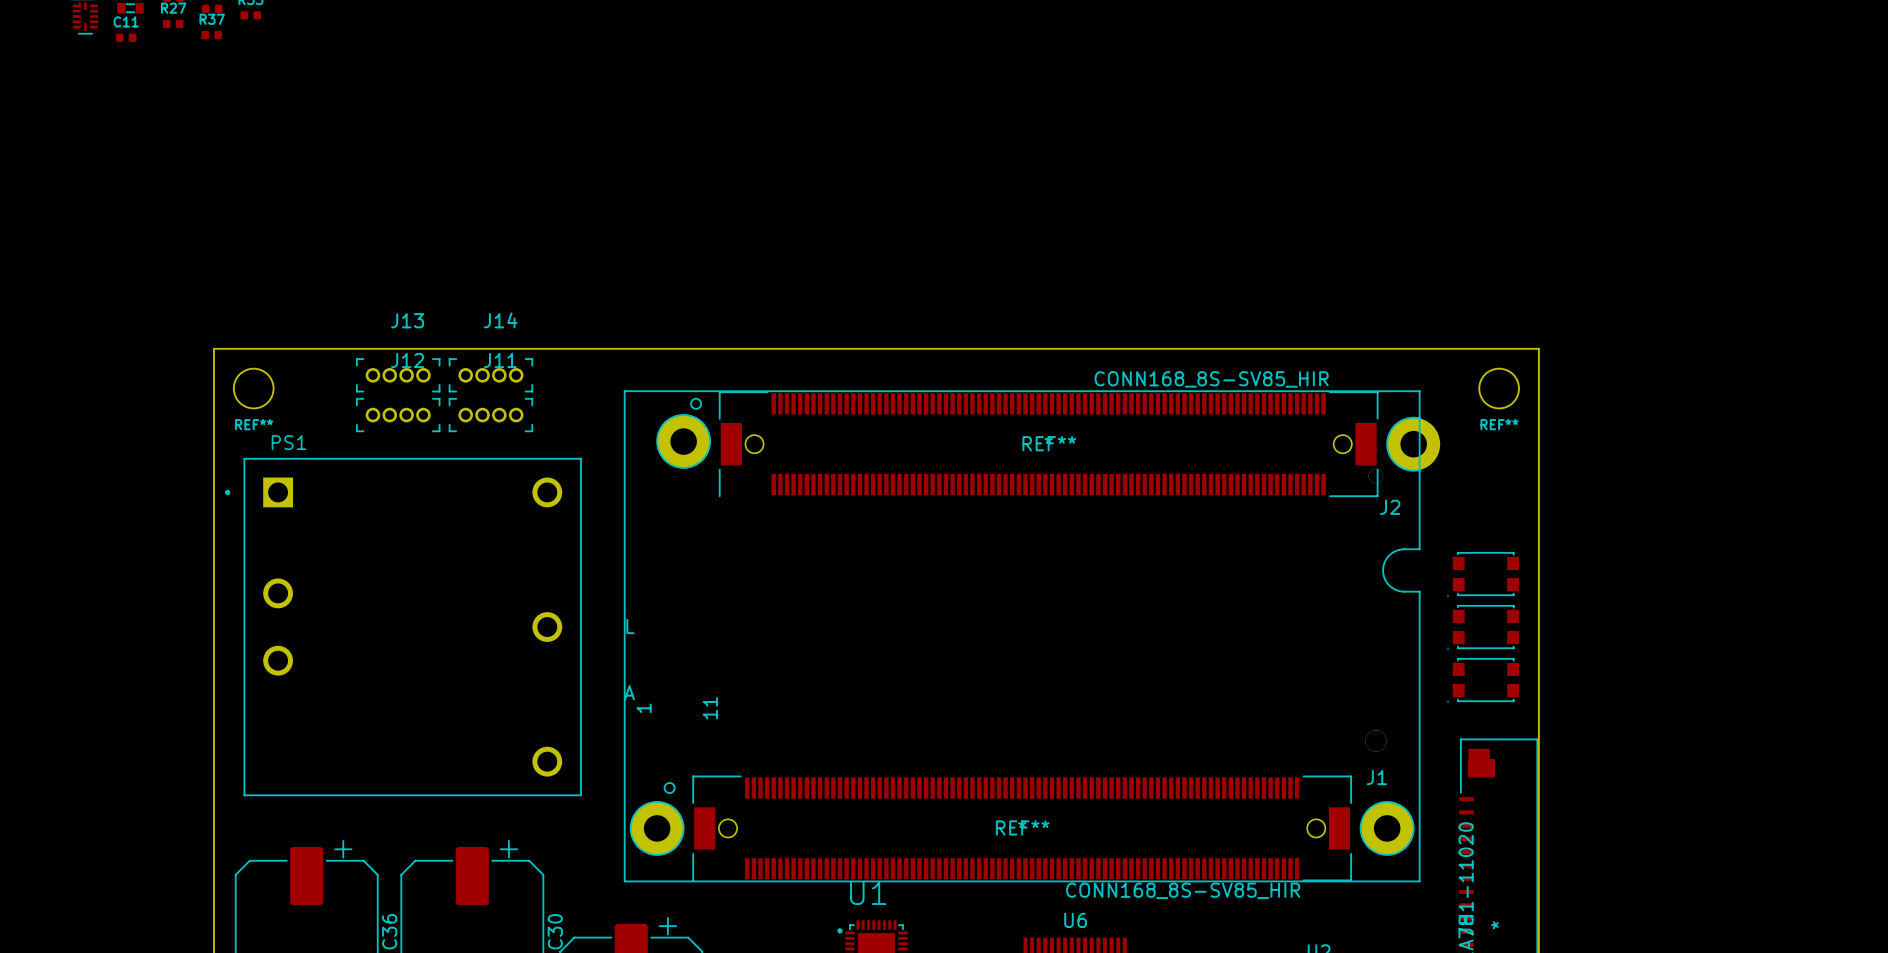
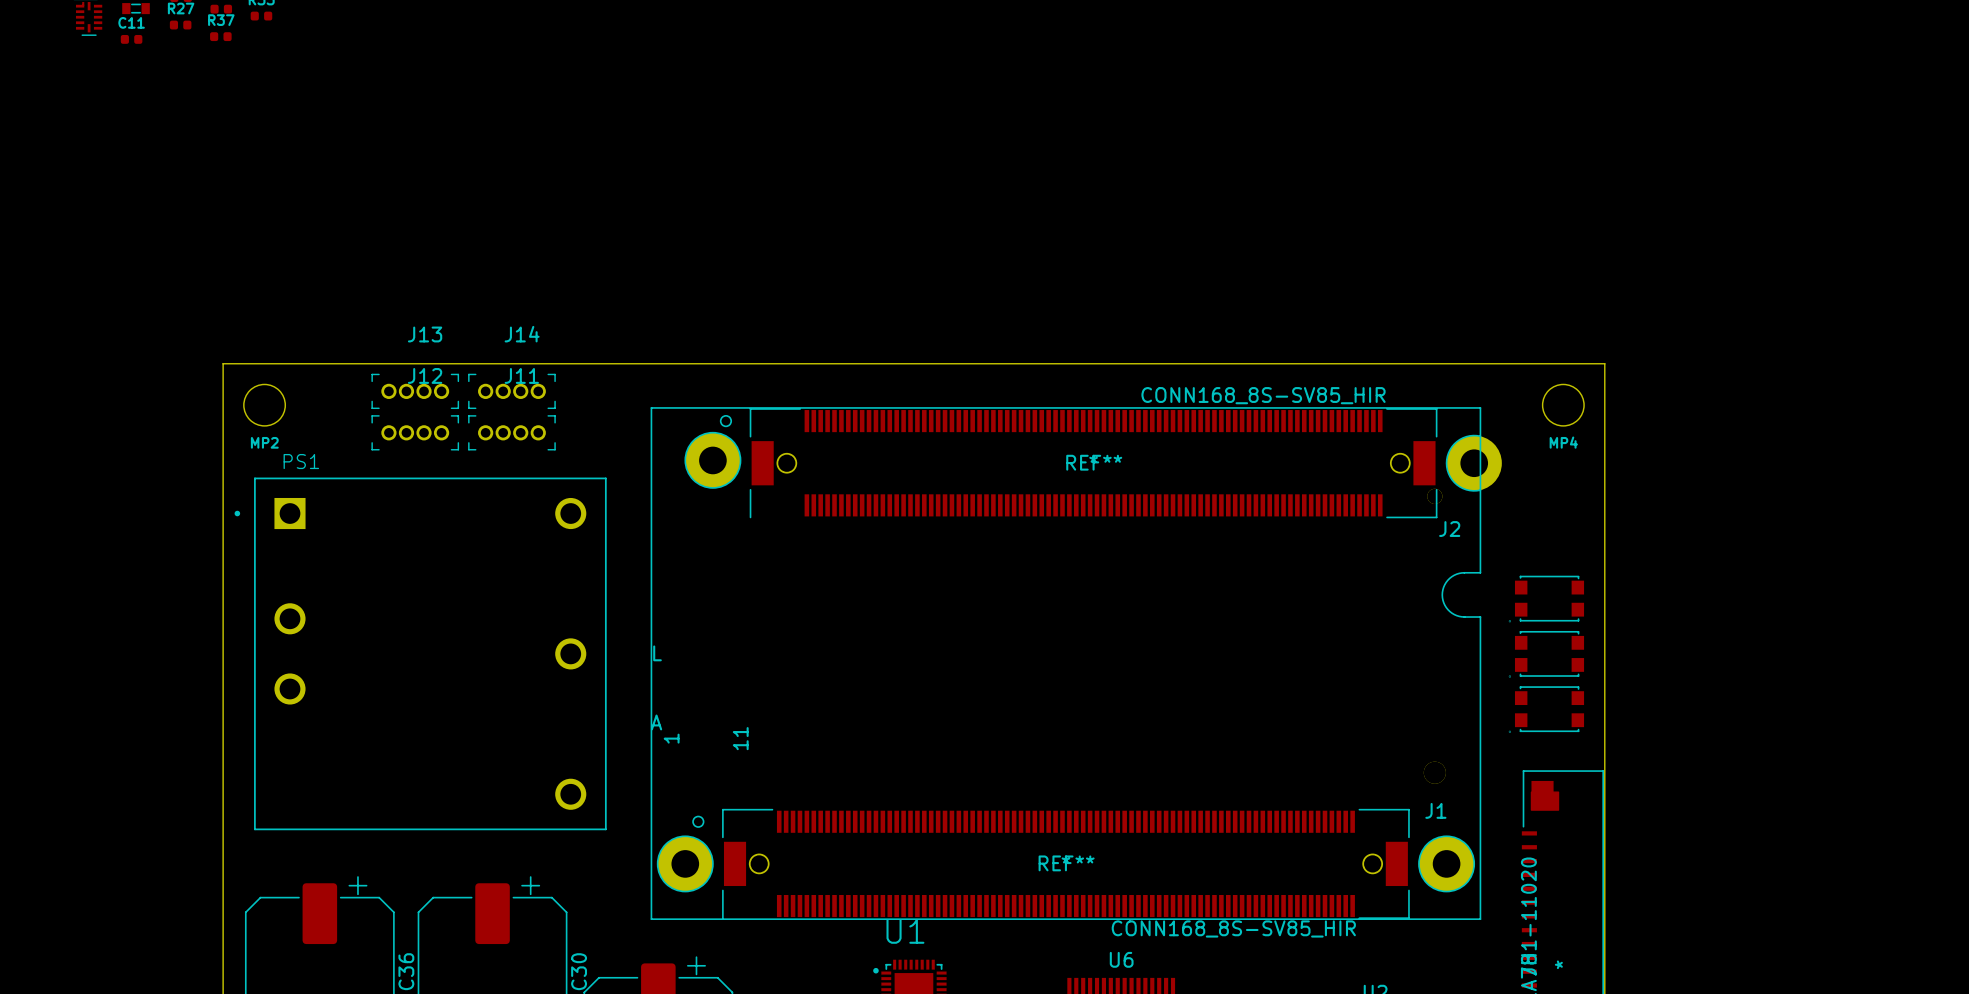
REF** name: REF** (254, 424) -> MP2 (264, 442)
REF** name: REF** (1499, 424) -> MP4 (1563, 442)

